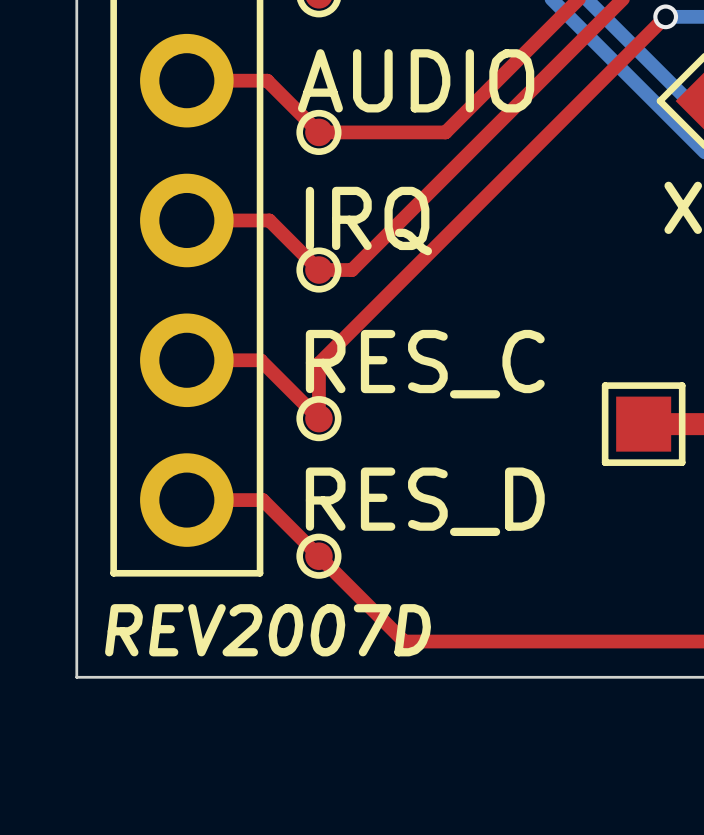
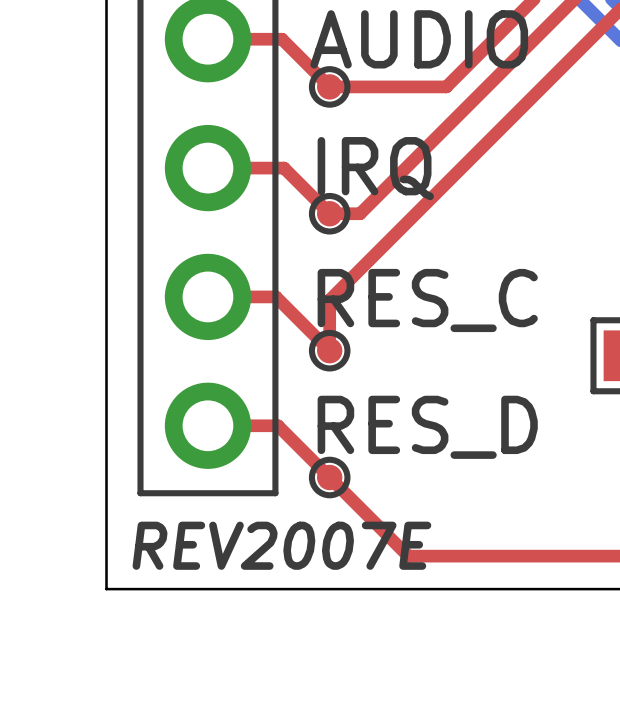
text: REV2007D (268, 630) -> REV2007E (281, 545)

